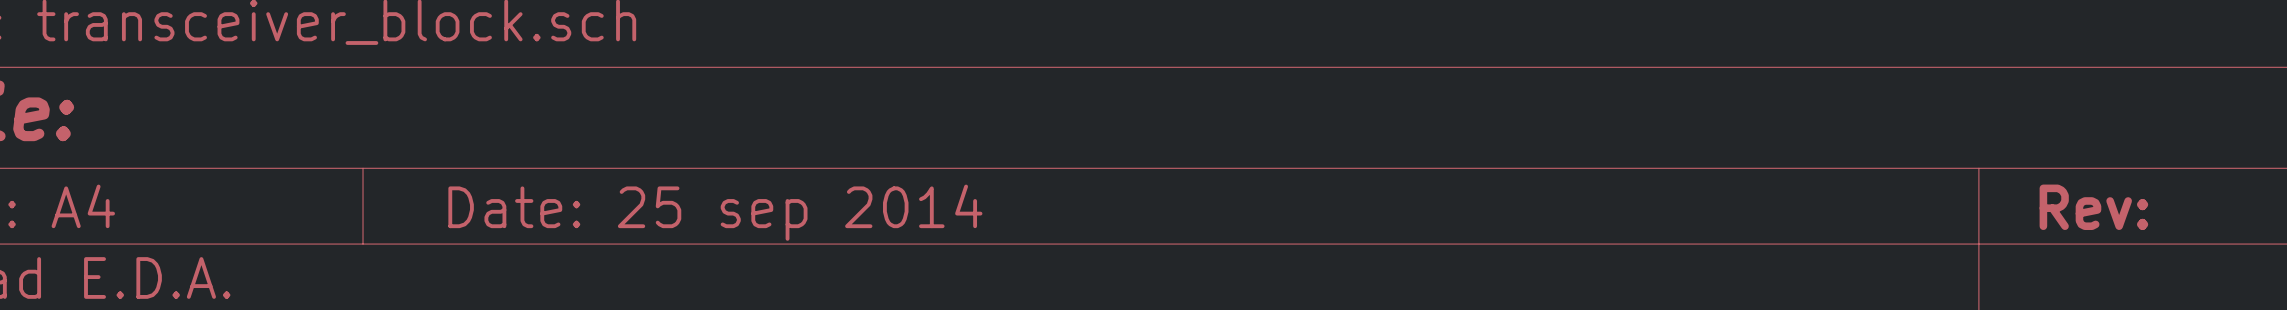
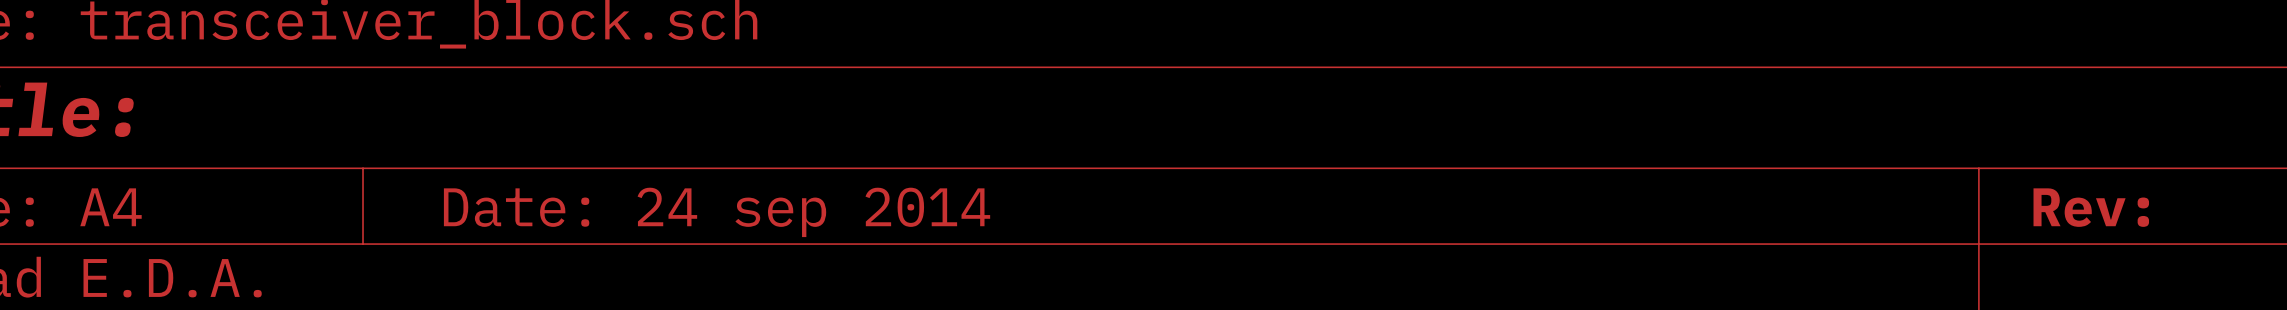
title block: Date: 25 sep 2014 (715, 212) -> Date: 24 sep 2014 (717, 212)

